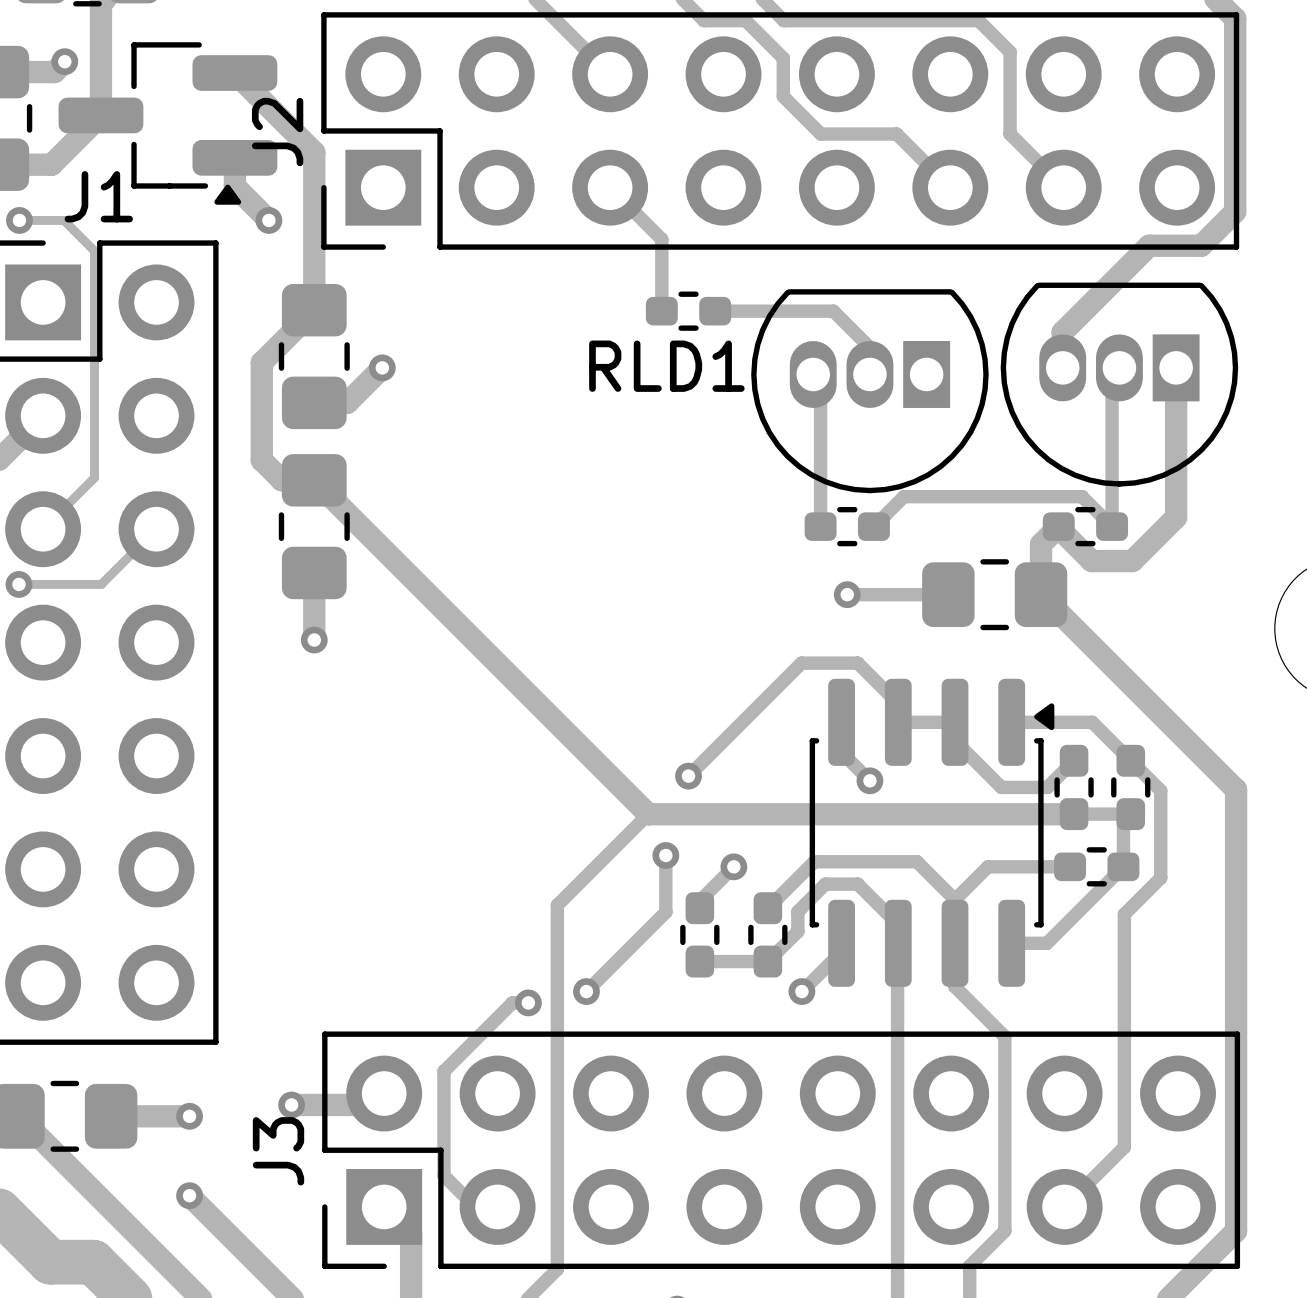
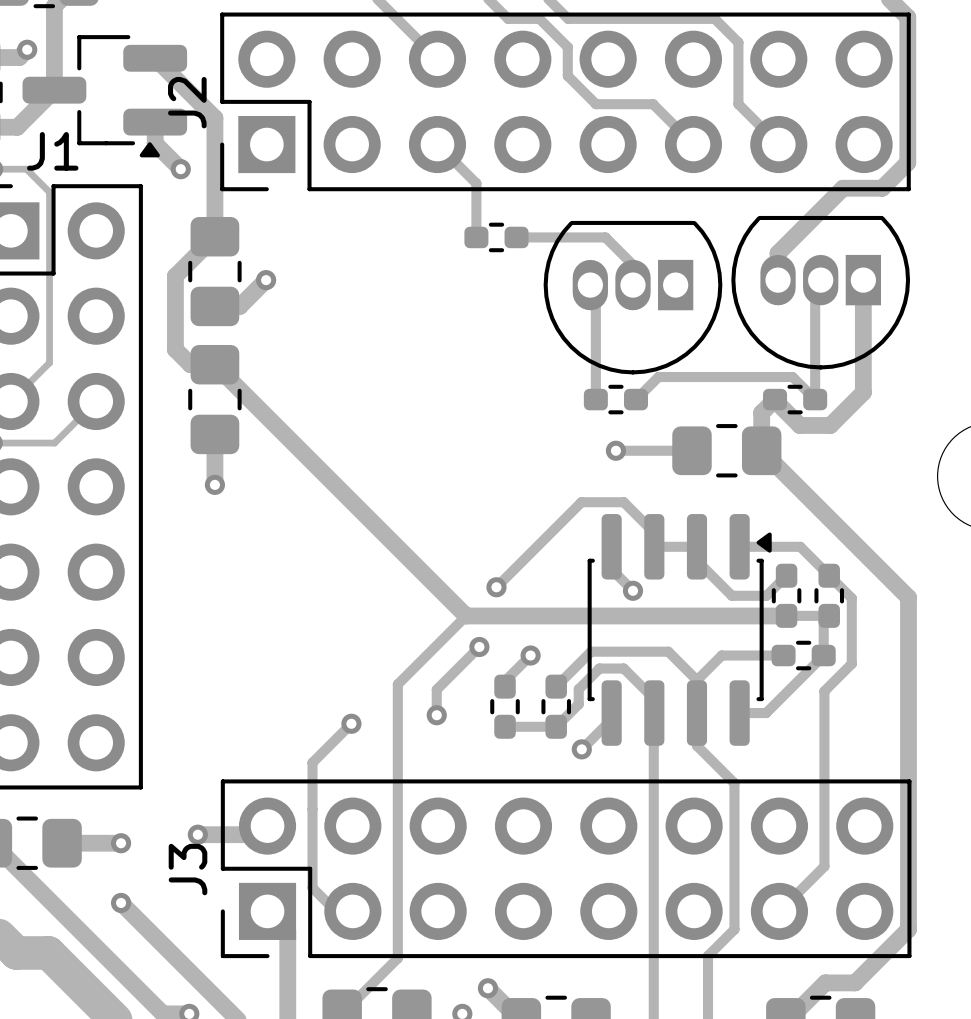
RLD1 name: RLD1 (666, 366) -> none
track: (665, 855) (665, 912) (586, 991) -> (479, 646) (436, 689) (436, 715)
via: none -> (436, 715)
via: none -> (351, 723)
via: (586, 991) -> none
track: (528, 1002) (512, 1002) (443, 1071) -> (351, 723) (312, 762) (312, 809)
via: (528, 1002) -> none

